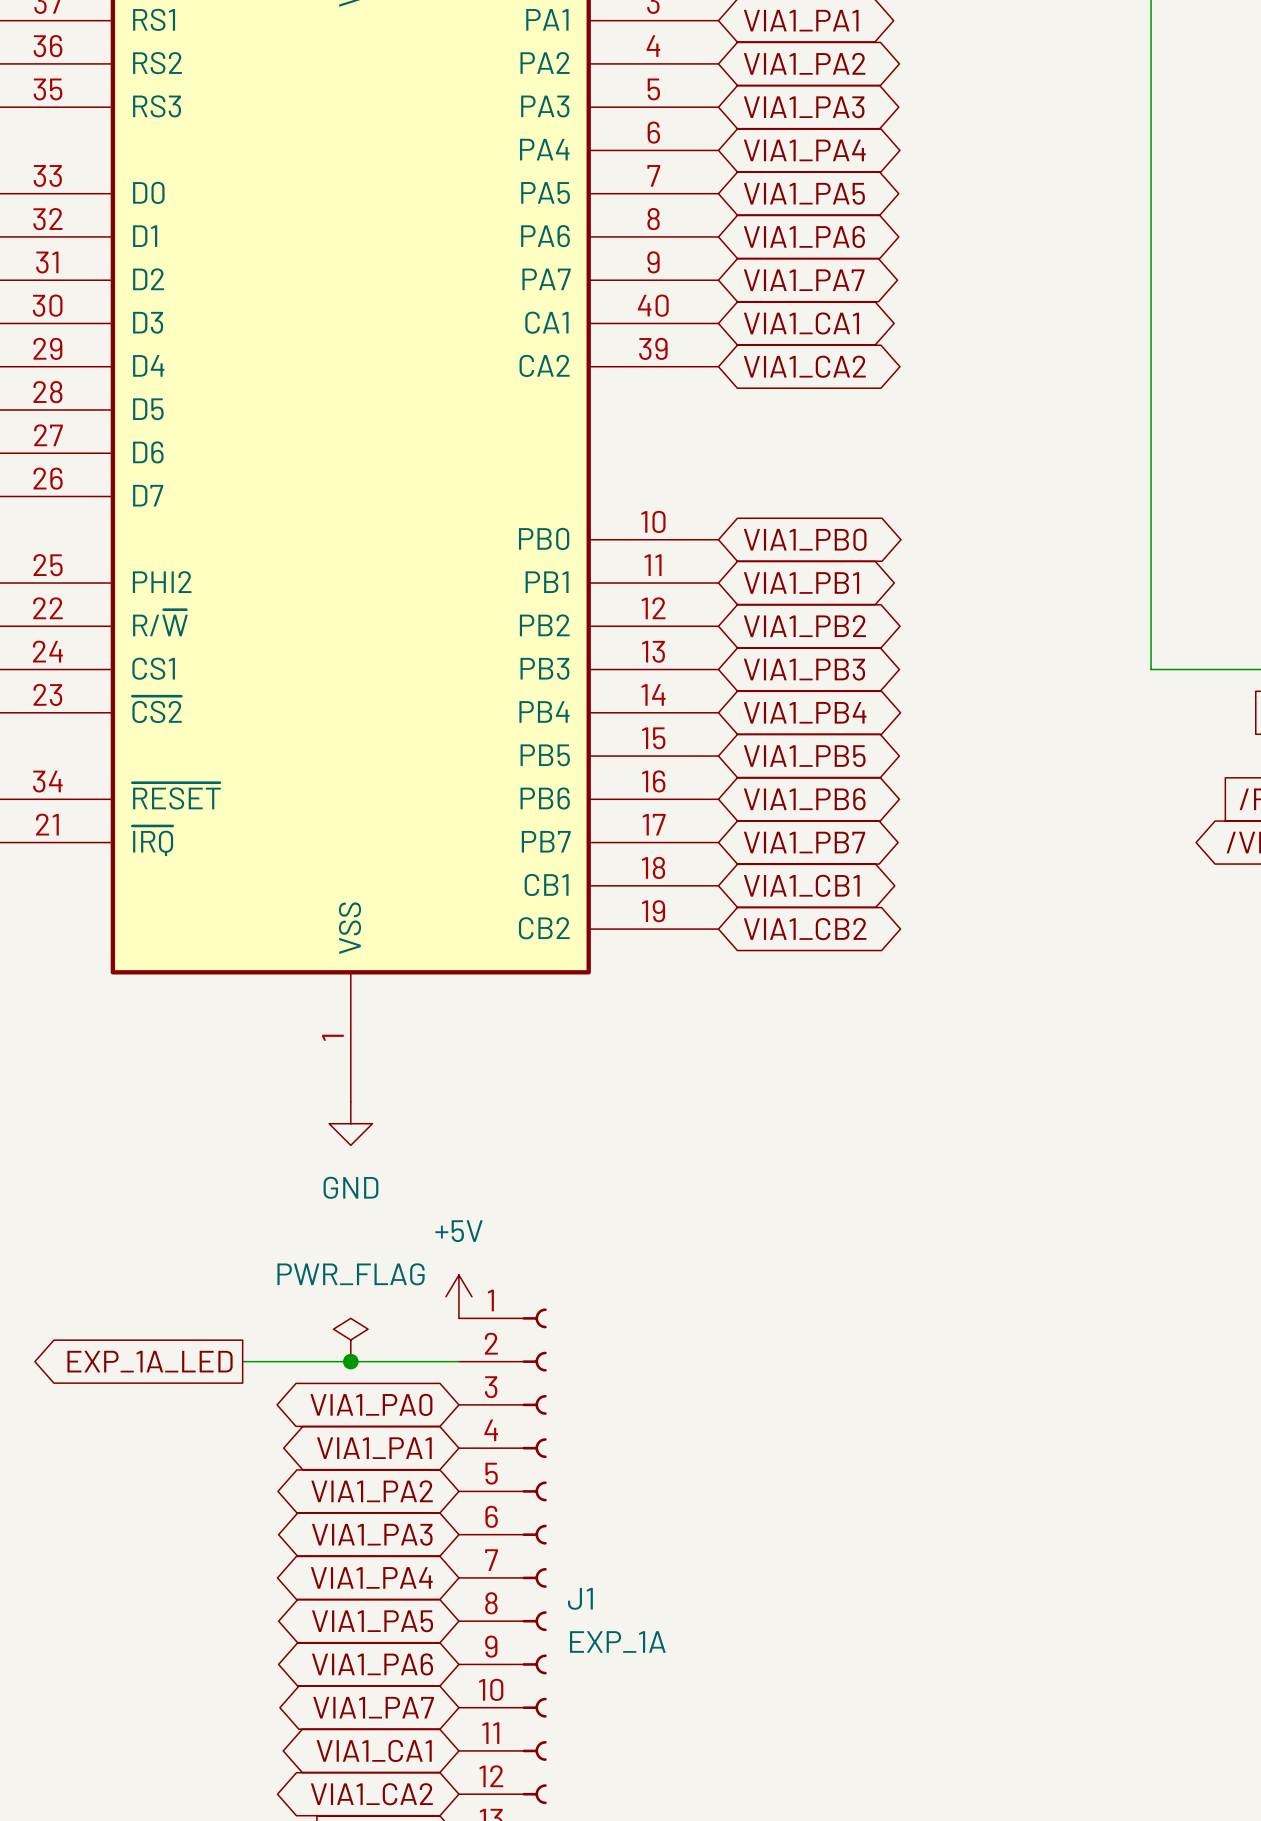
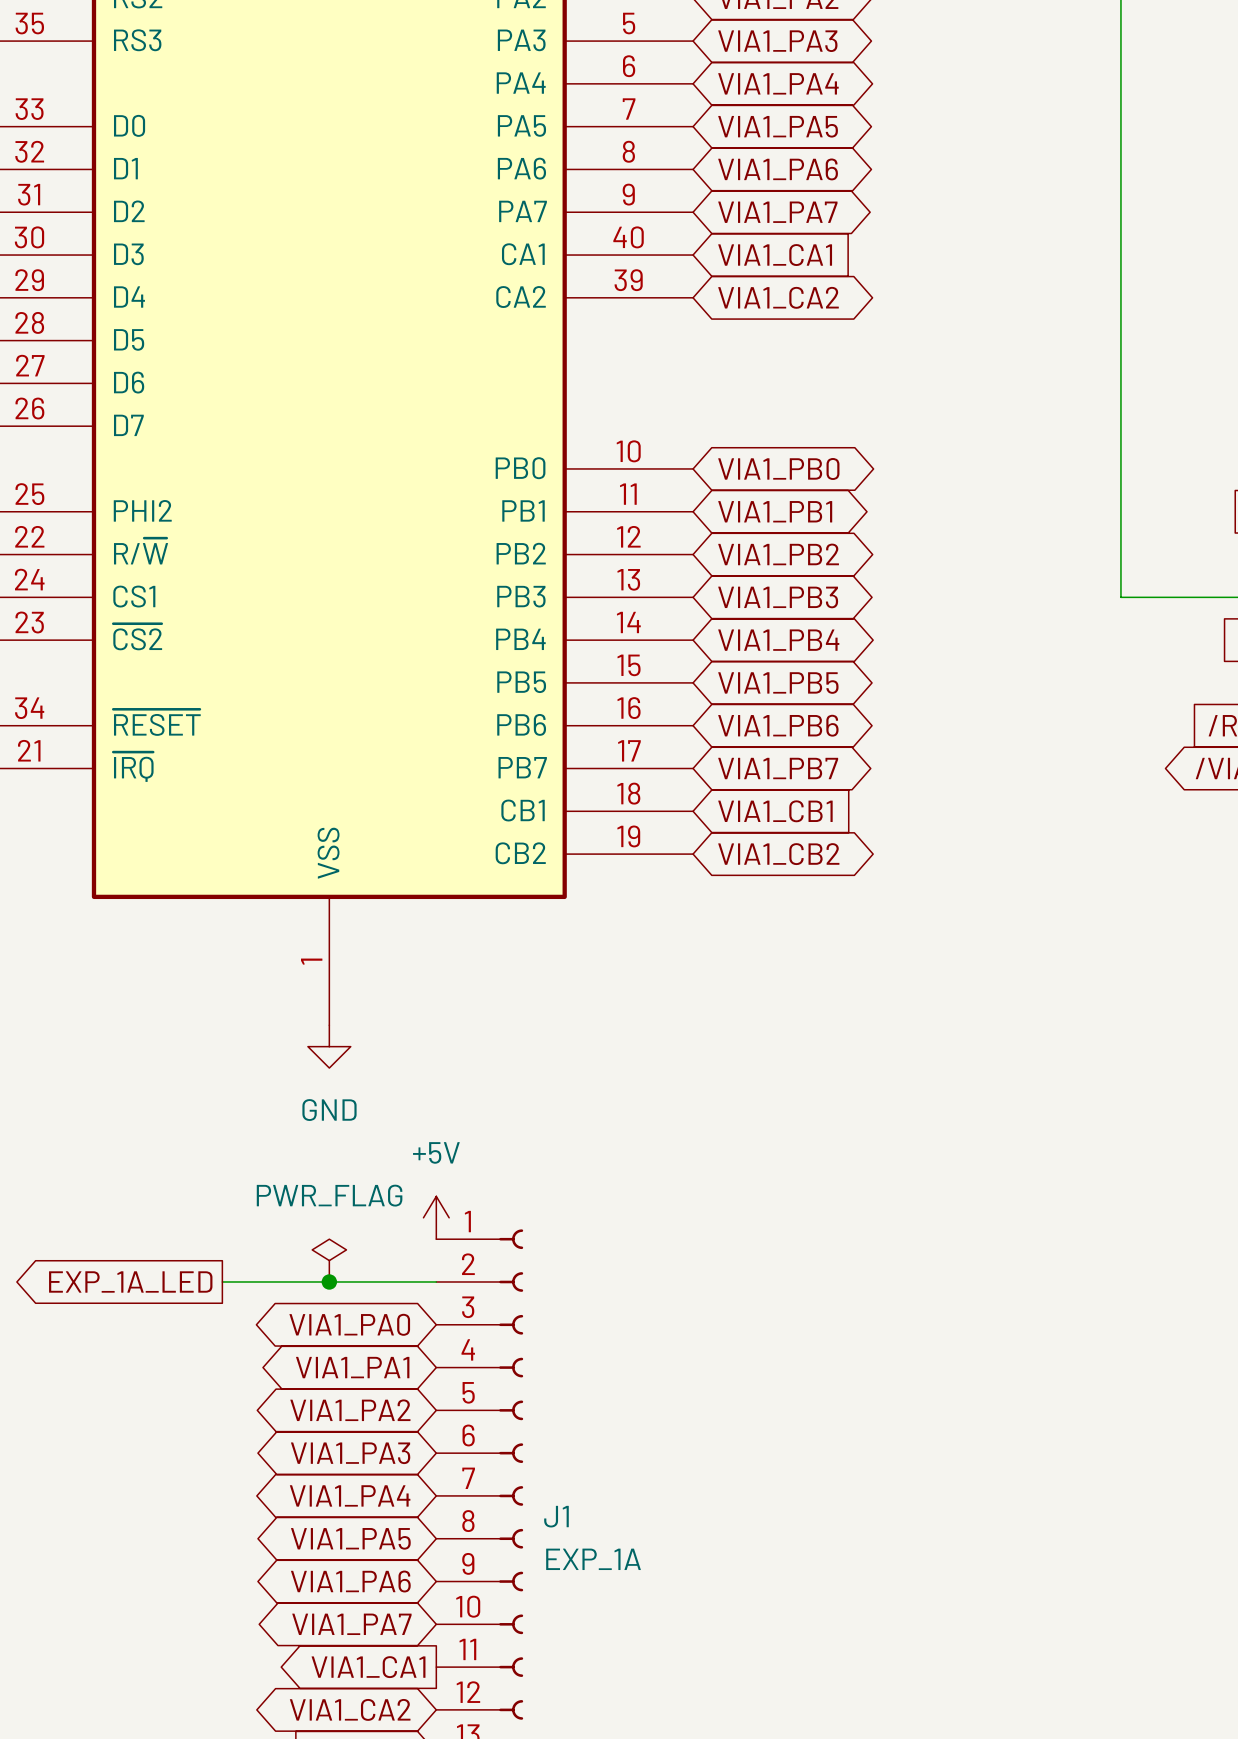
global label shape: bidirectional (801, 323) -> input (775, 255)
global label shape: bidirectional (801, 885) -> input (775, 811)
global label shape: bidirectional (374, 1750) -> output (368, 1667)

